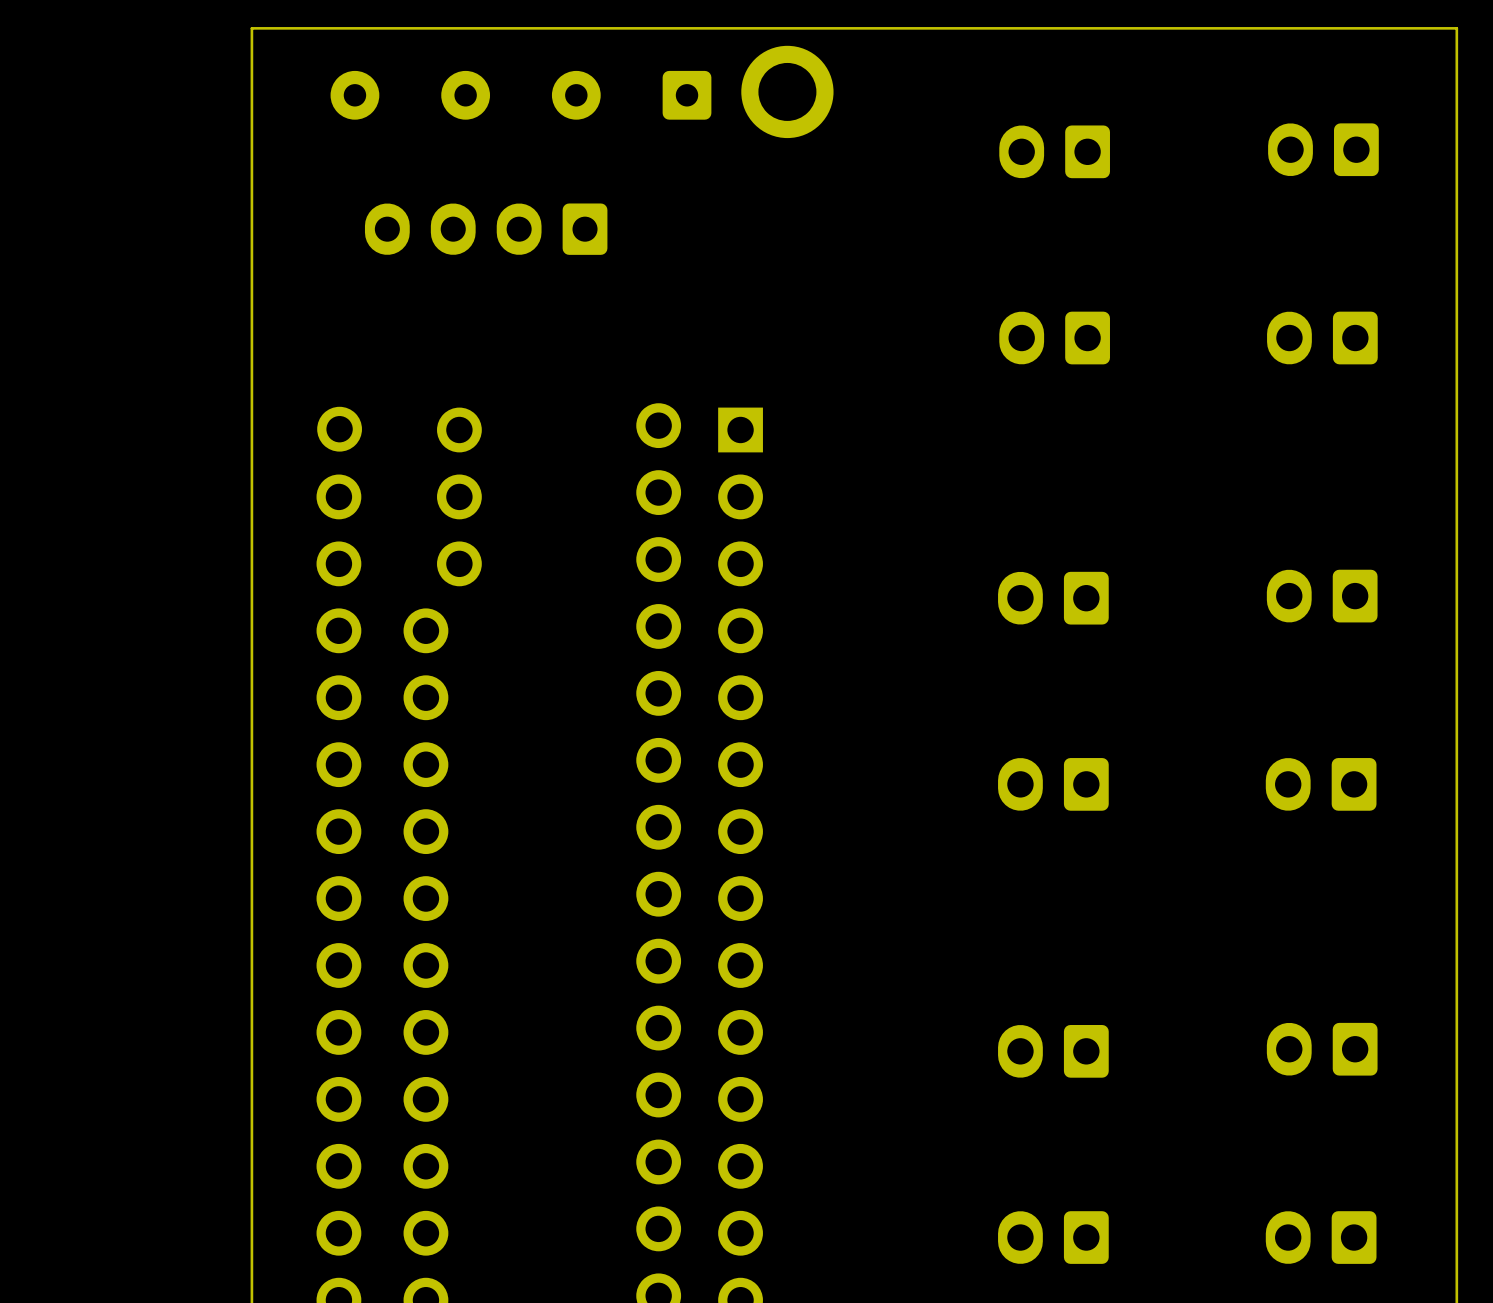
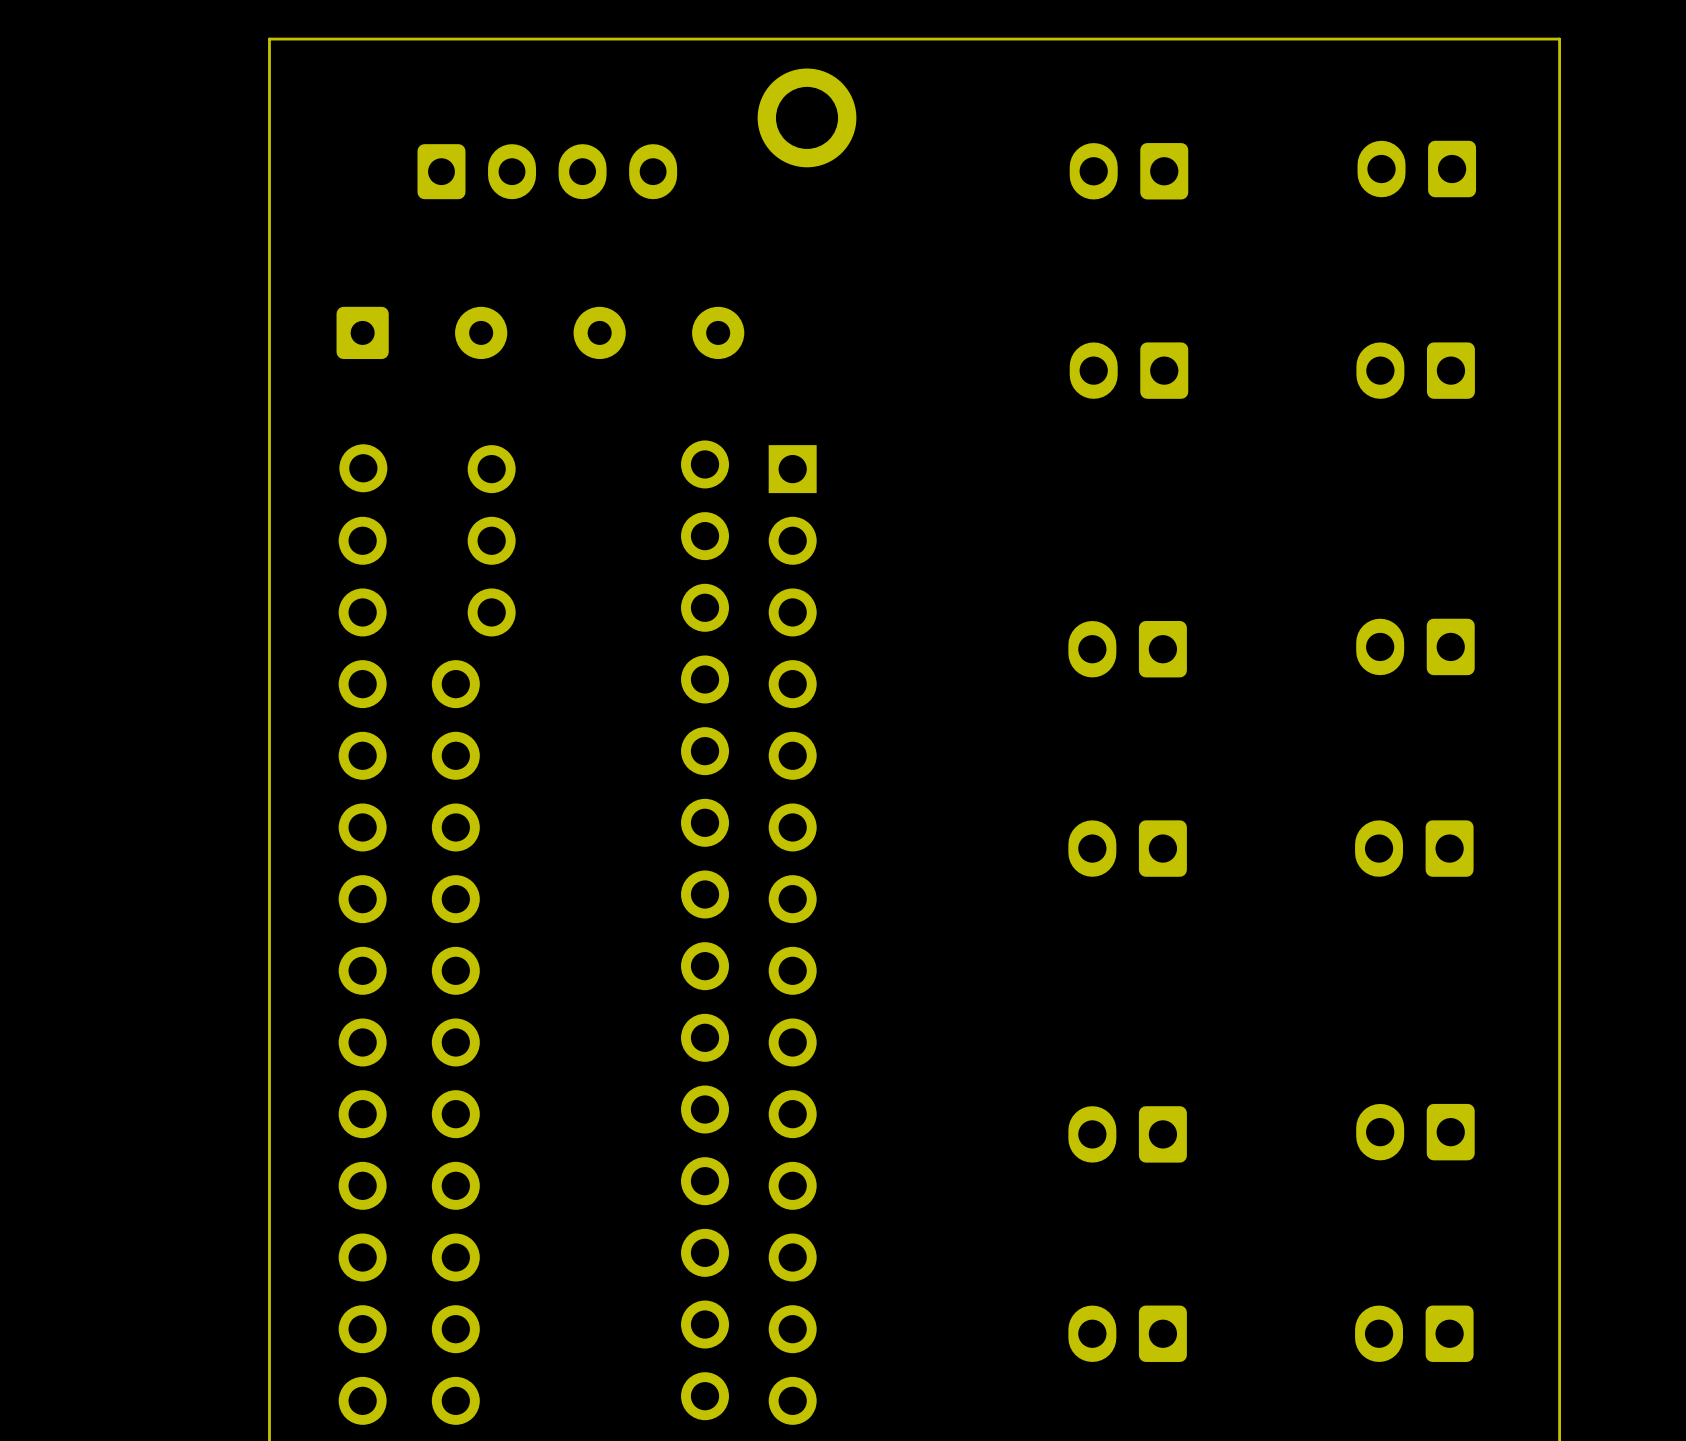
part position: (787, 91) -> (807, 117)
part rotation: 0° (520, 95) -> 180° (540, 332)
part rotation: 0° (486, 229) -> 180° (547, 171)

